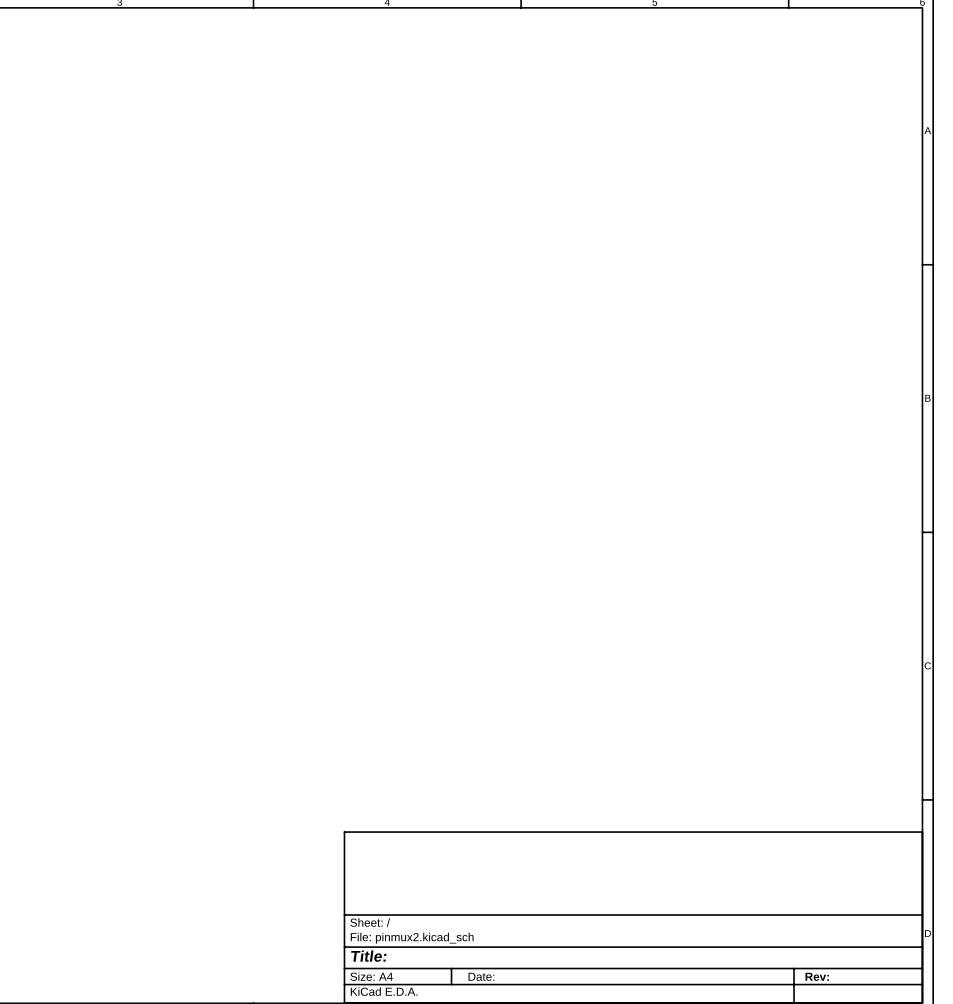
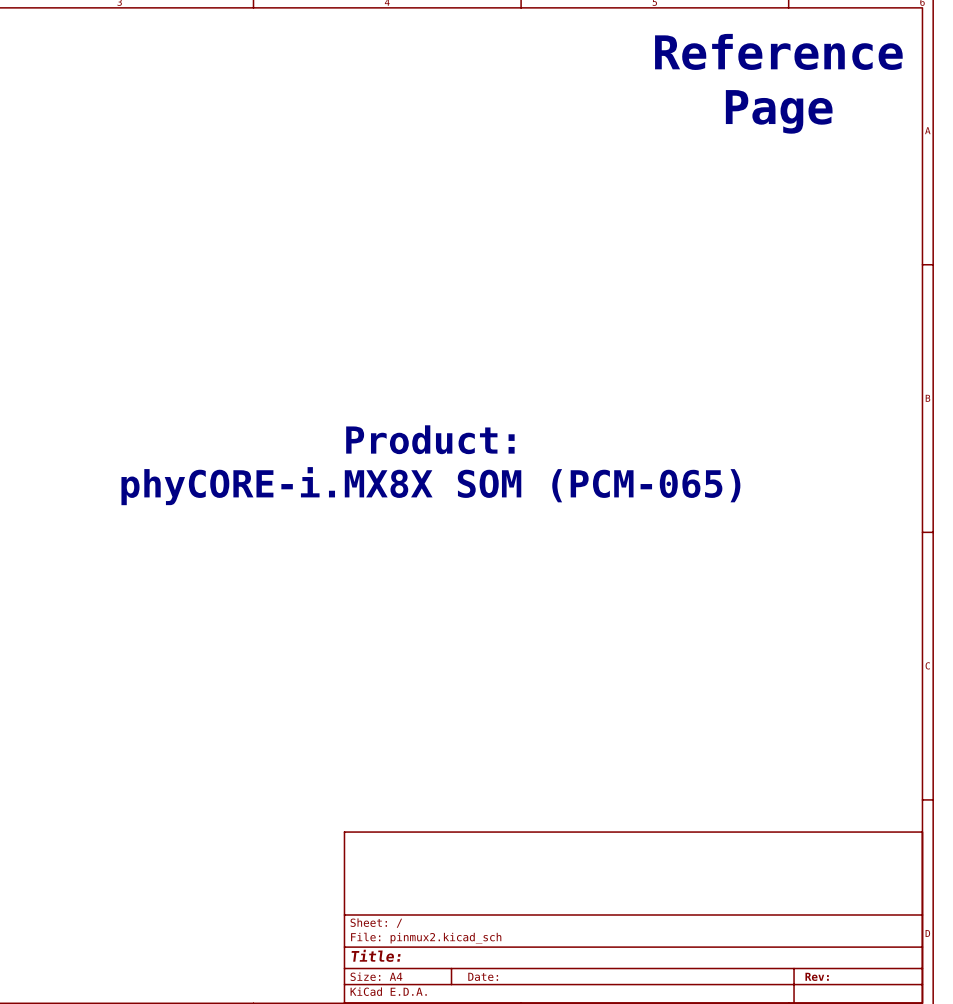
text: none -> Reference (778, 51)
text: none -> Page (779, 111)
text: none -> Product: (430, 439)
text: none -> phyCORE-i.MX8X SOM (PCM-065) (430, 486)

